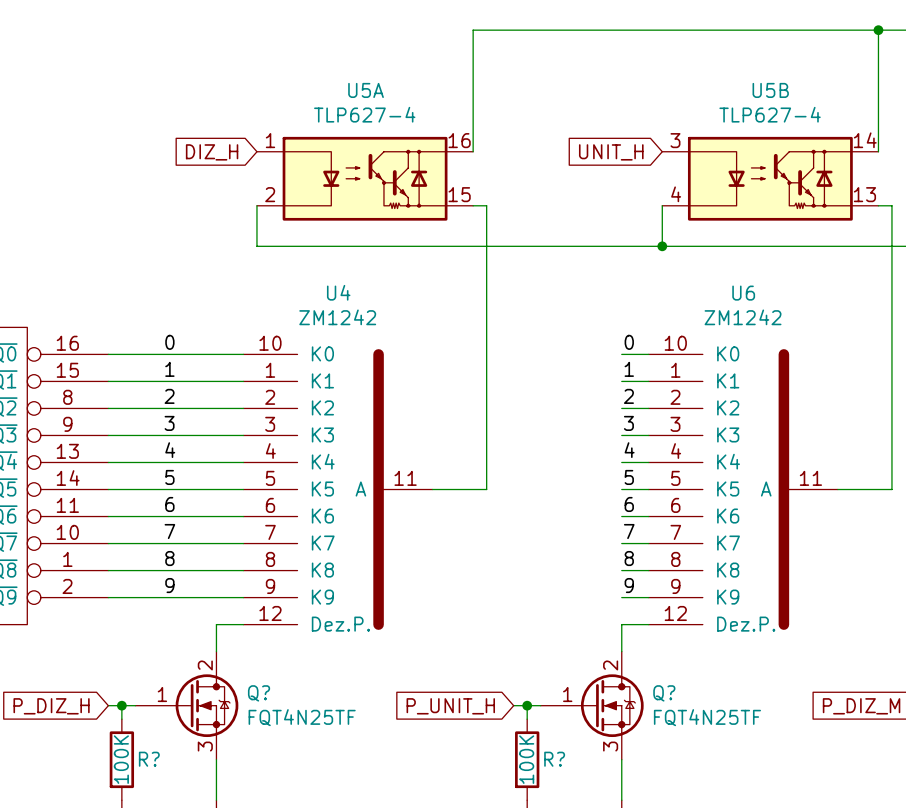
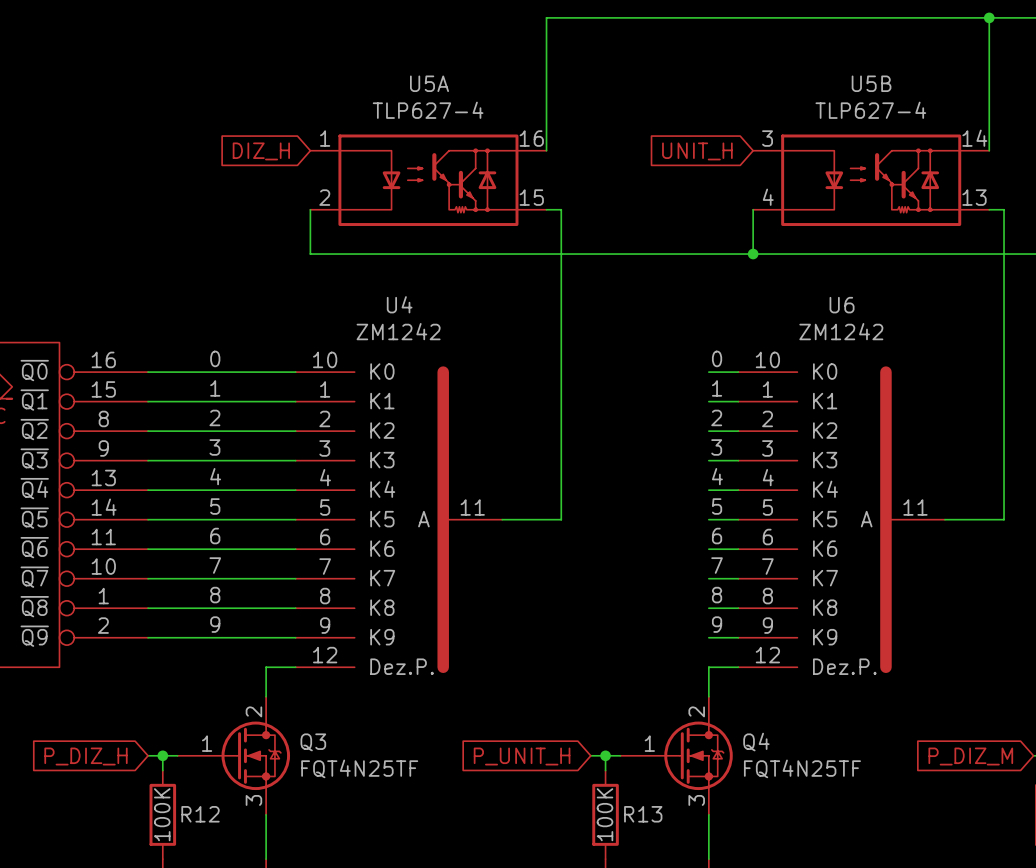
Q? name: Q? (259, 693) -> Q3 (313, 742)
Q? name: Q? (664, 693) -> Q4 (756, 742)
R? name: R? (149, 759) -> R12 (200, 814)
R? name: R? (554, 759) -> R13 (643, 814)

